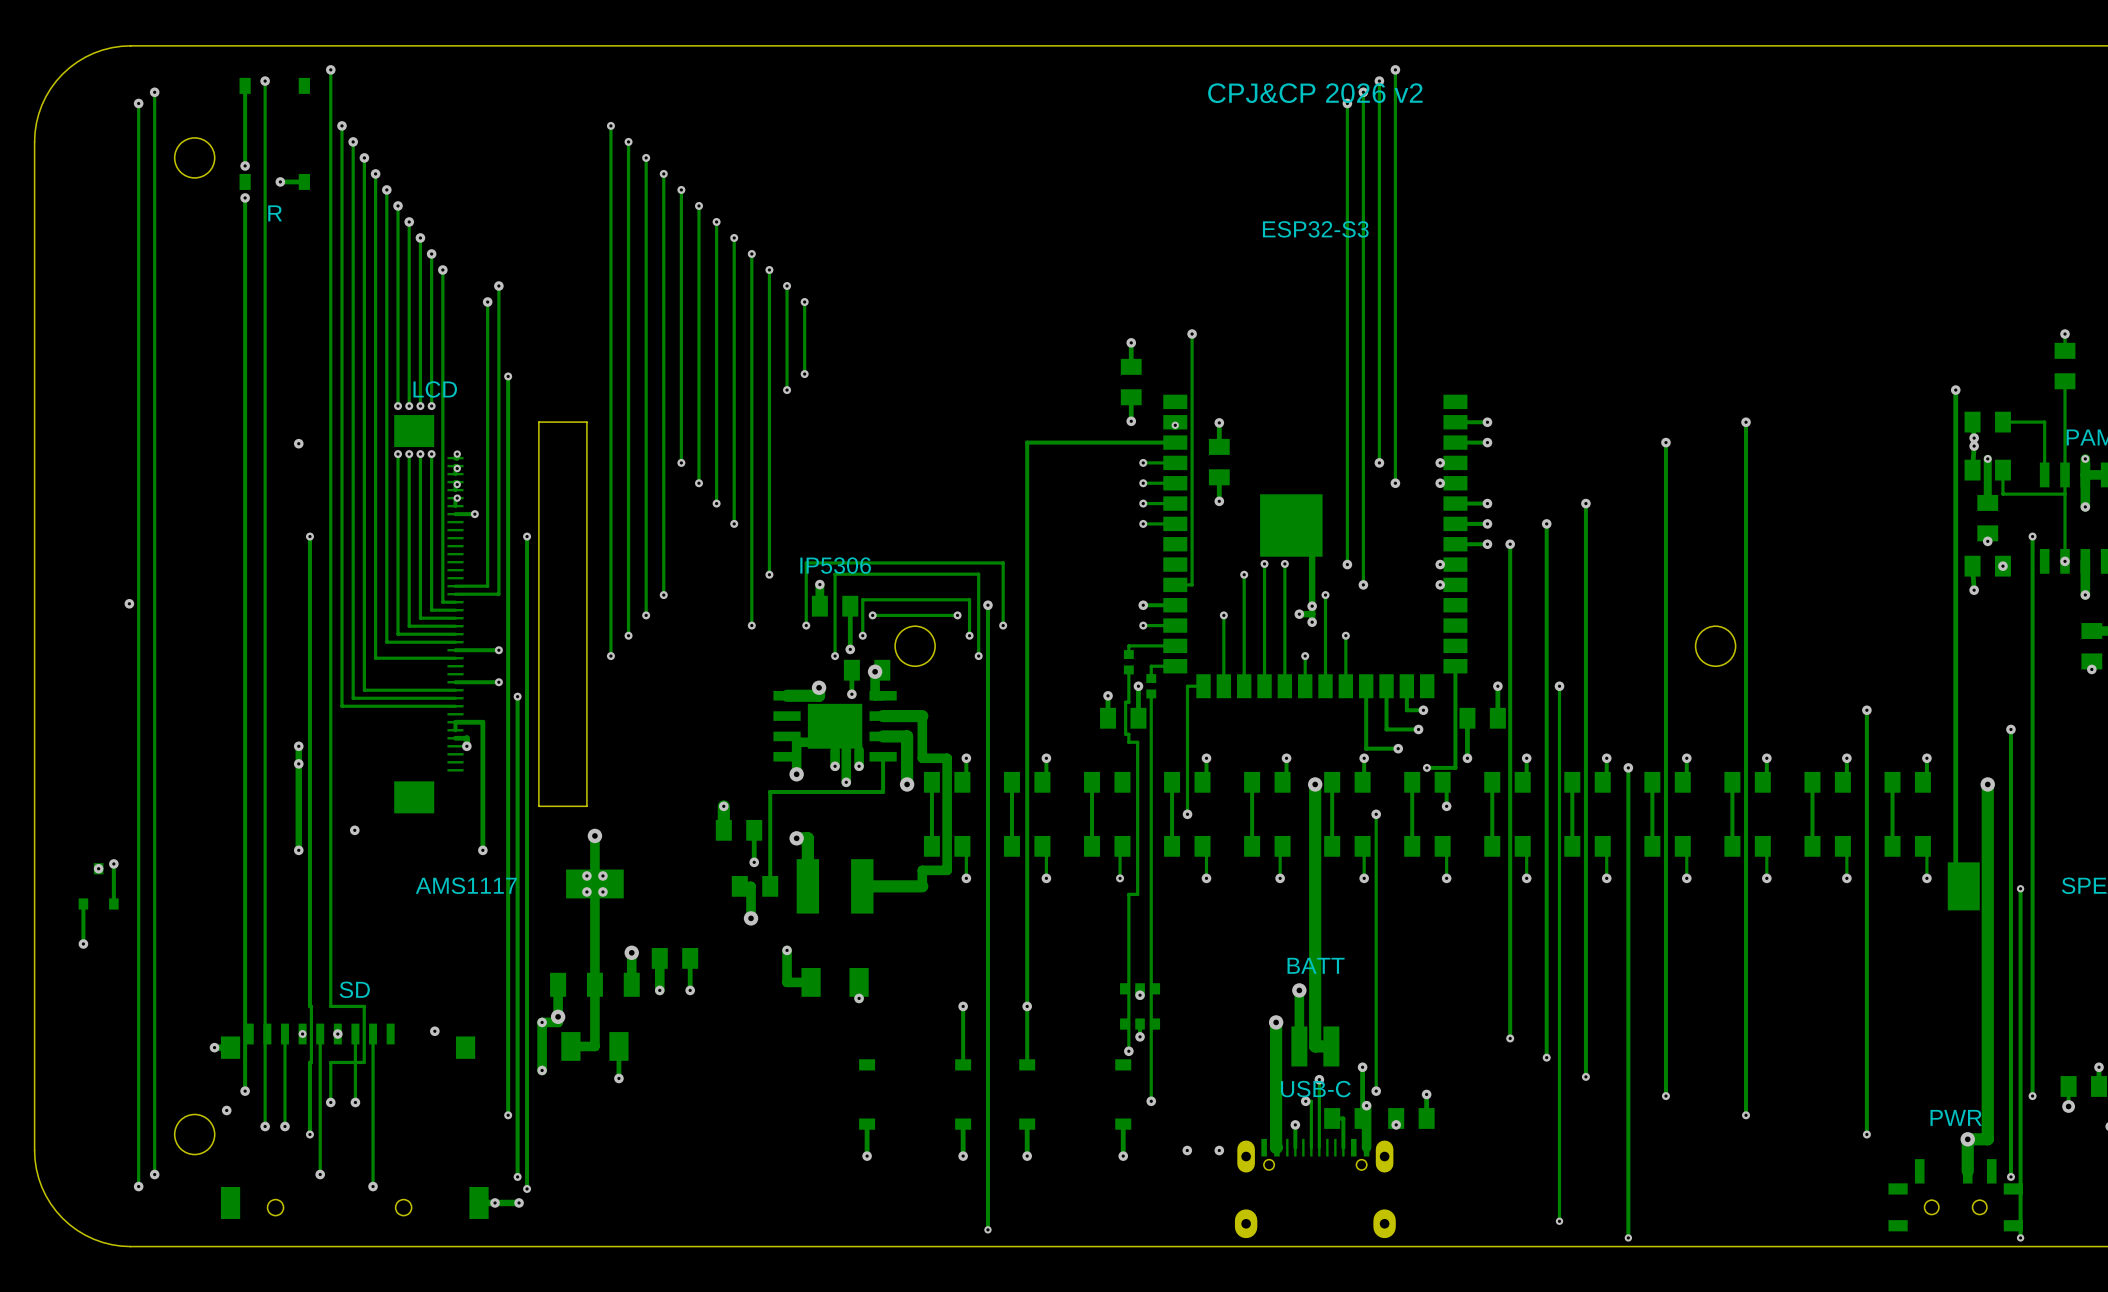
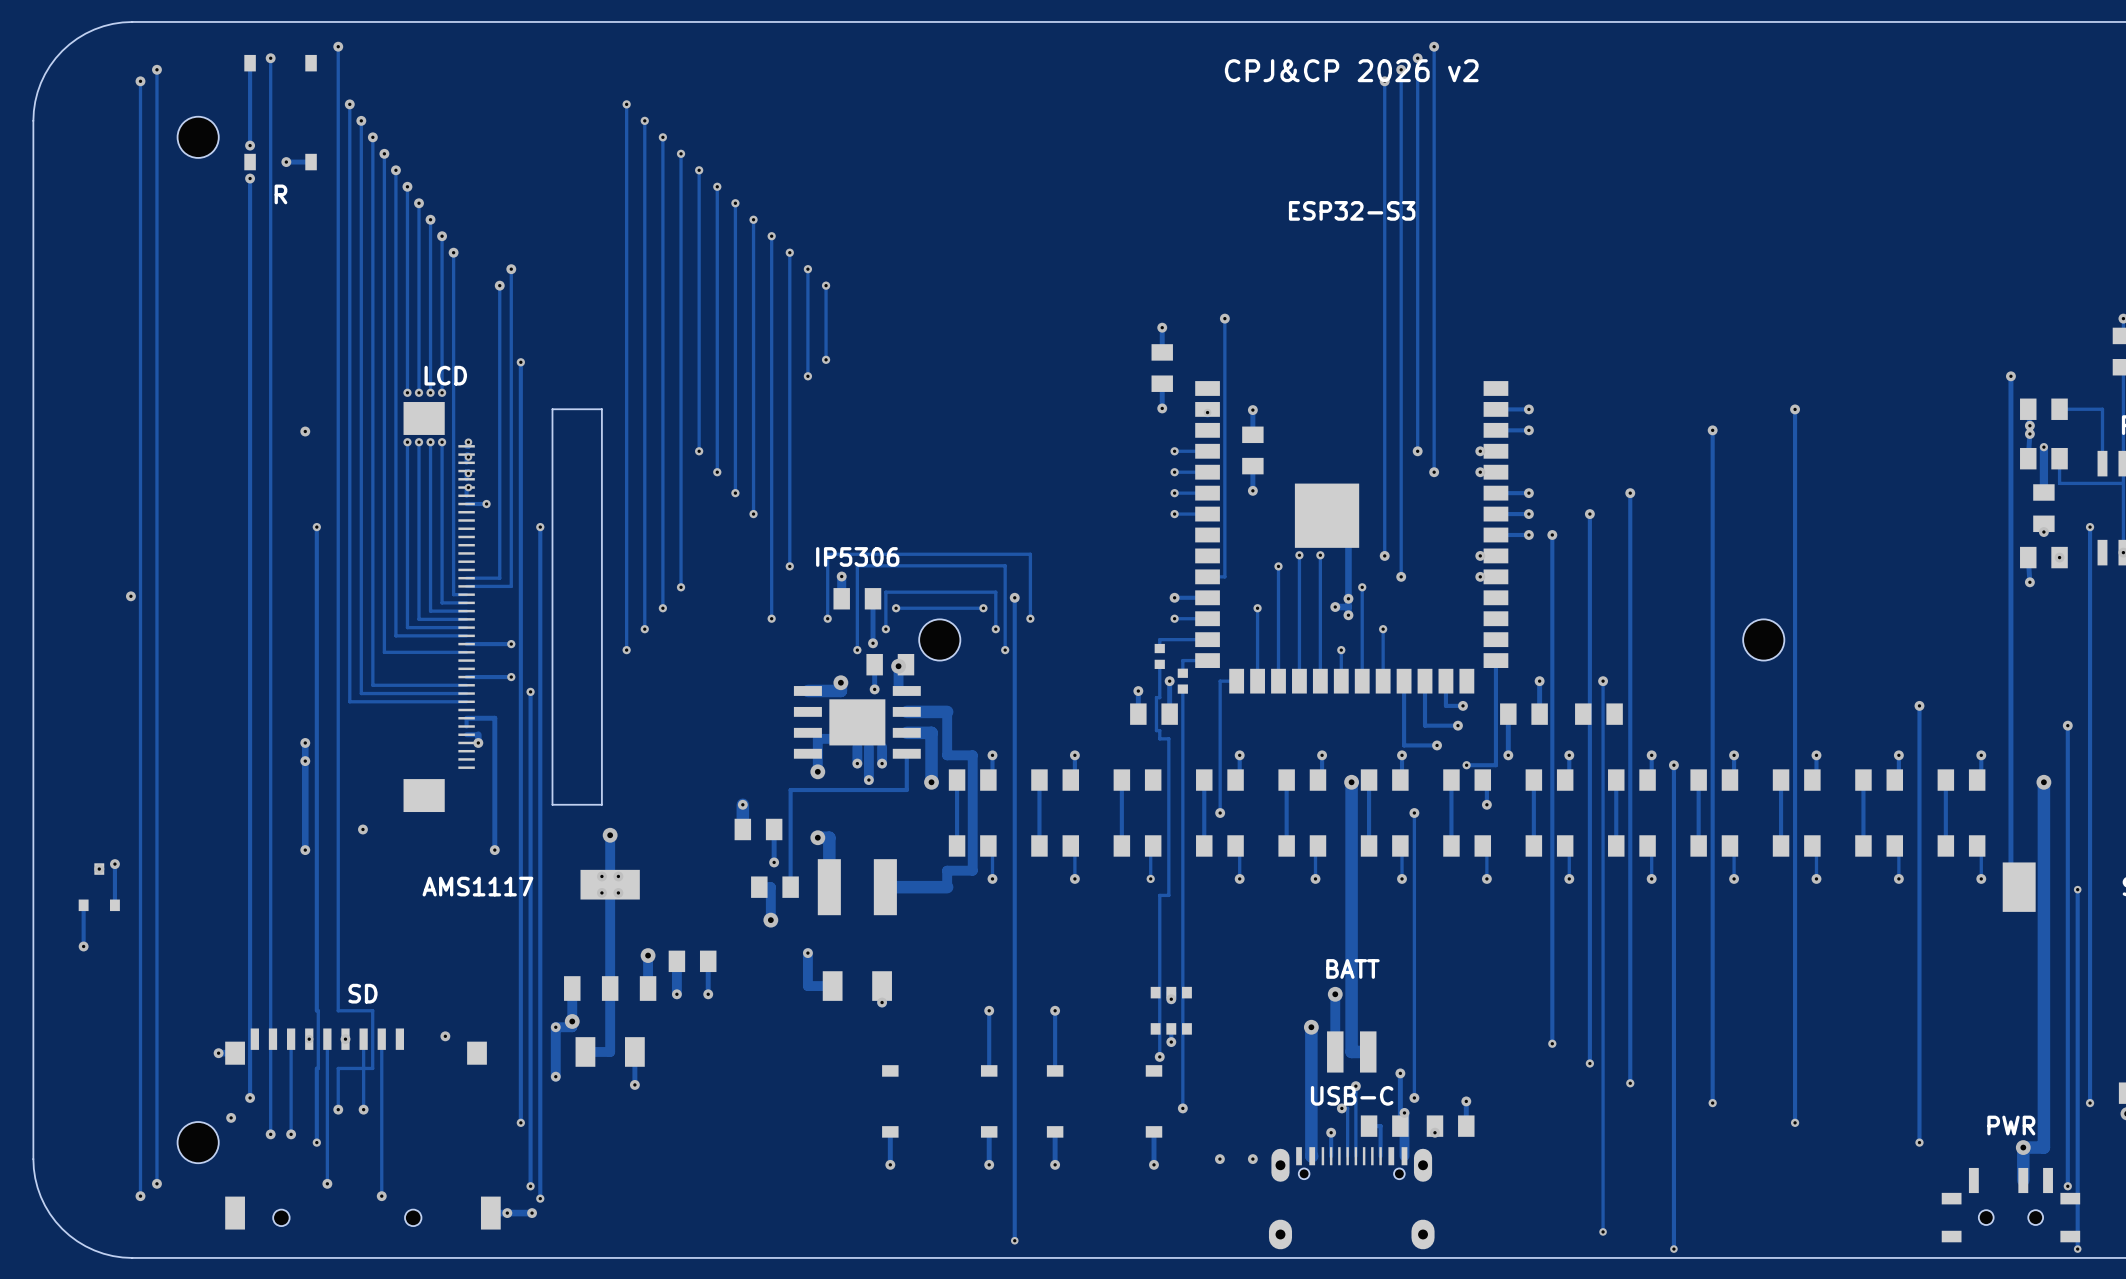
track: (1175, 442) (1027, 442) (1027, 1006) -> none
part: none -> (1598, 714)

